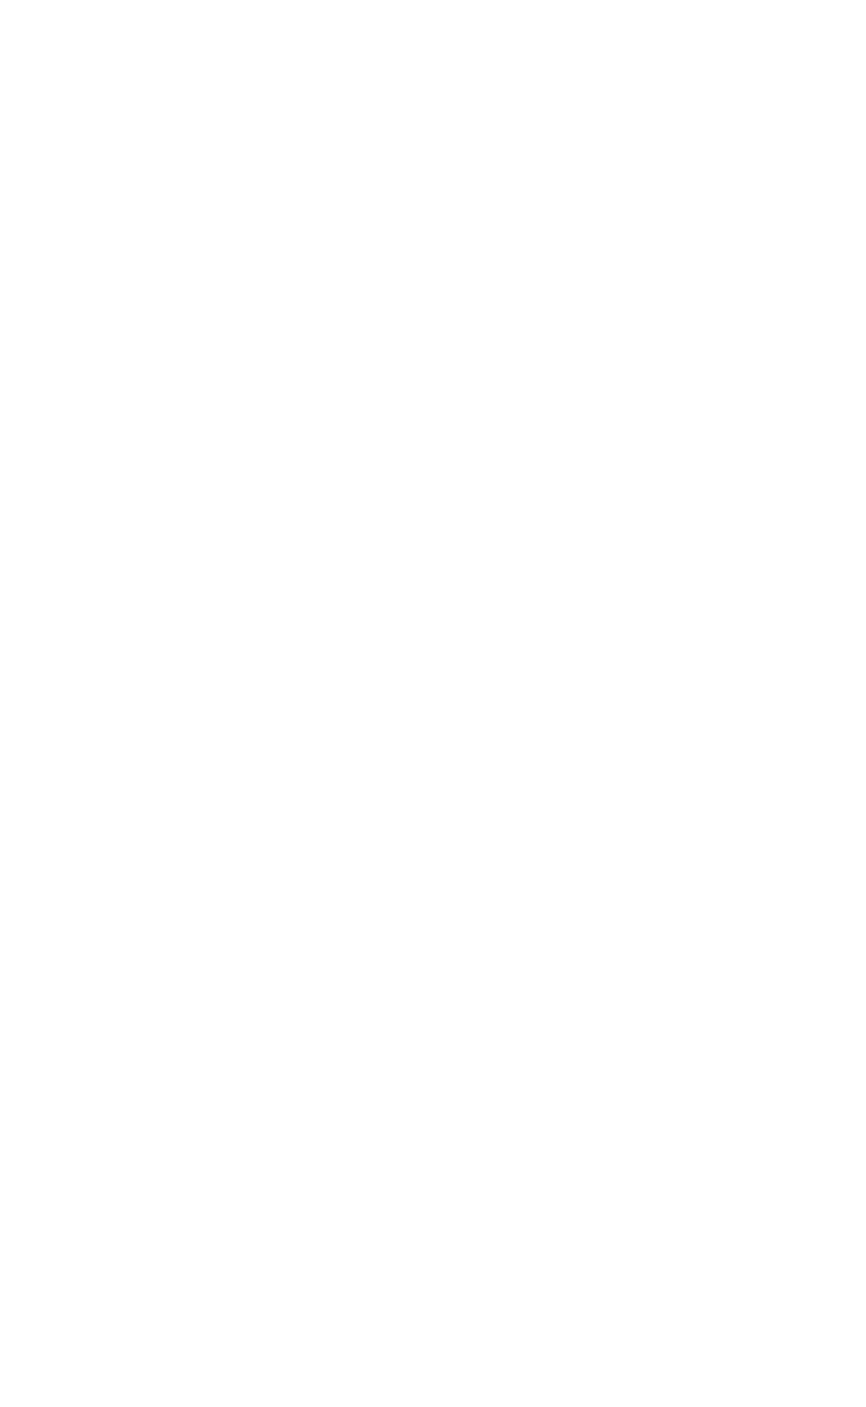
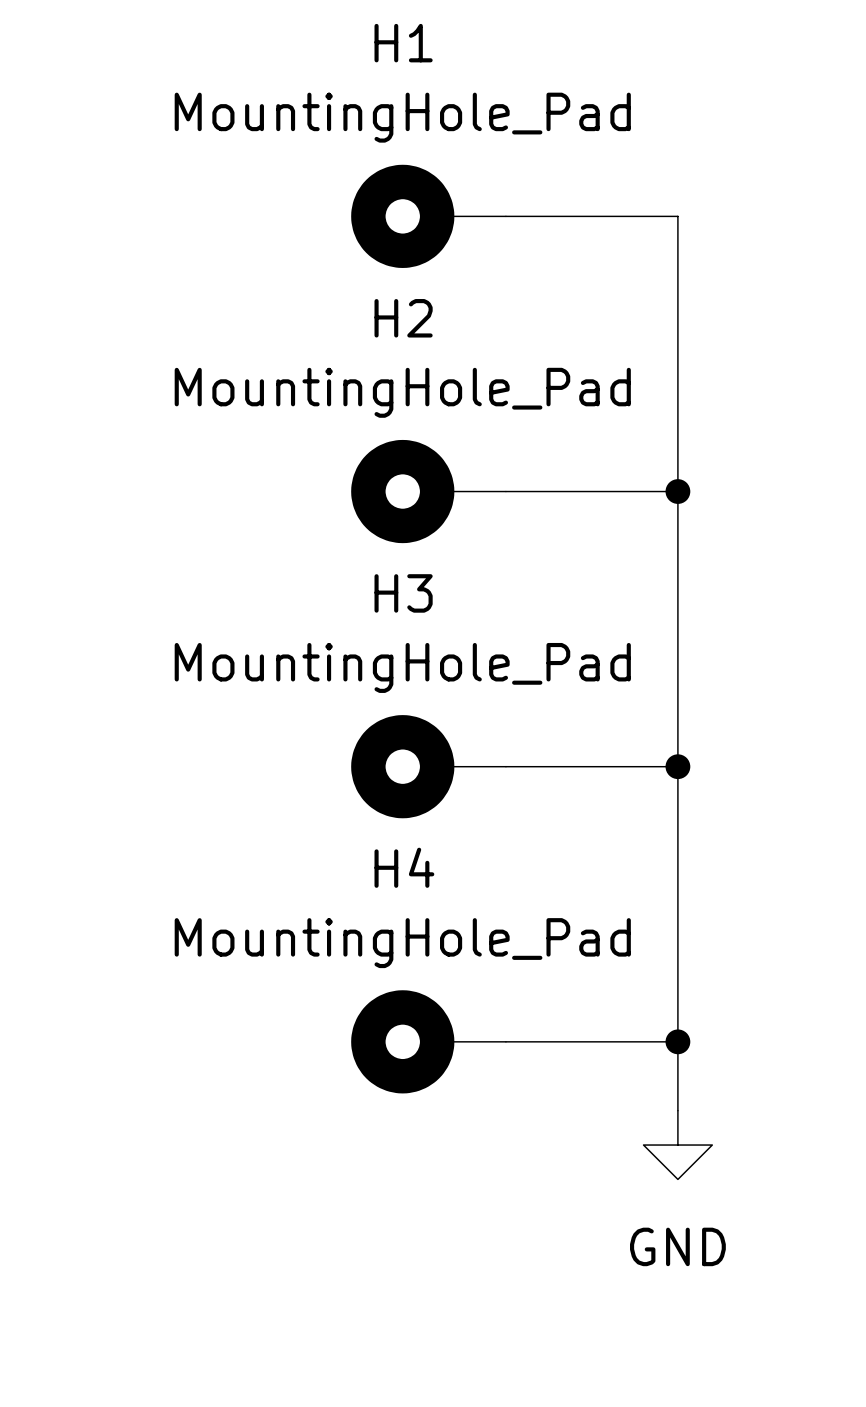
H1: none -> MountingHole_Pad (428, 216)
wire: none -> (505, 216) (677, 216) (677, 1110)
H2: none -> MountingHole_Pad (428, 491)
wire: none -> (505, 491) (677, 491)
junction: none -> (677, 491)
H3: none -> MountingHole_Pad (428, 766)
wire: none -> (505, 766) (677, 766)
junction: none -> (677, 766)
H4: none -> MountingHole_Pad (428, 1041)
wire: none -> (505, 1041) (677, 1041)
junction: none -> (677, 1041)
power symbol: none -> GND (677, 1145)

